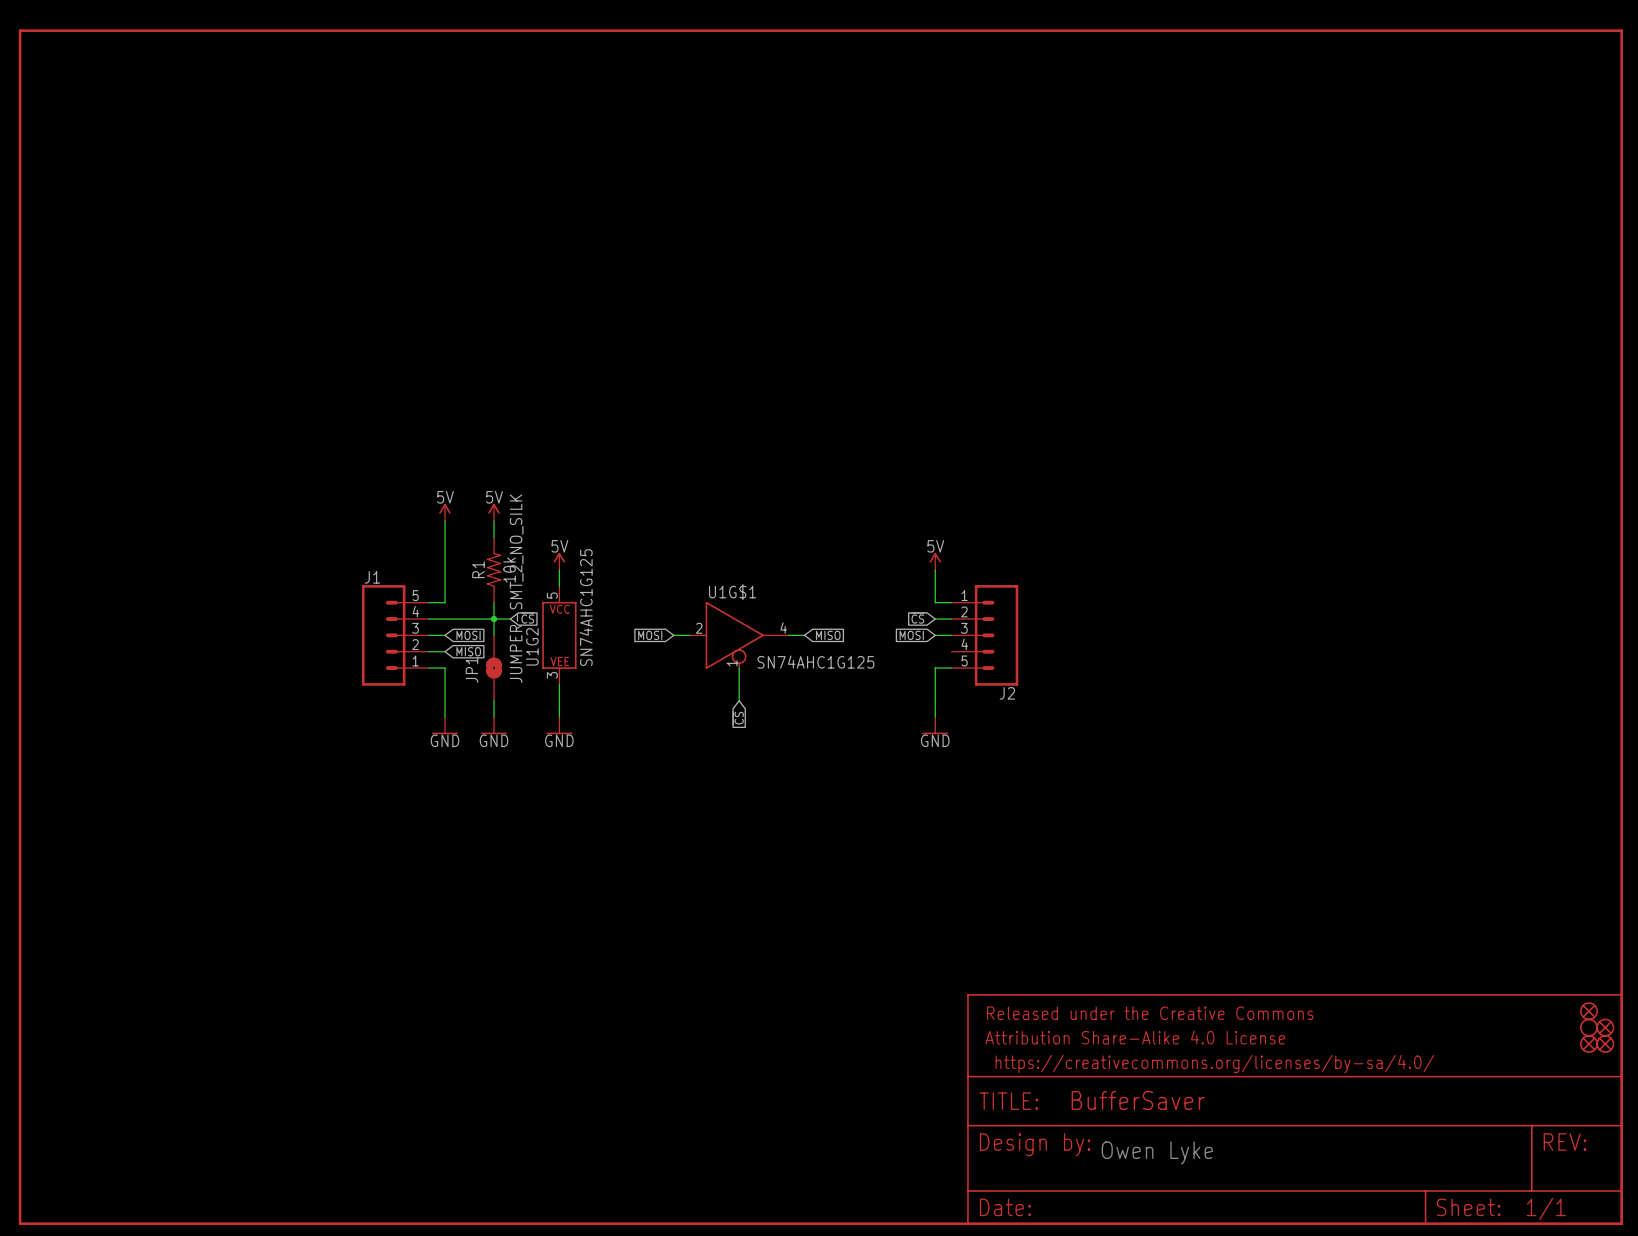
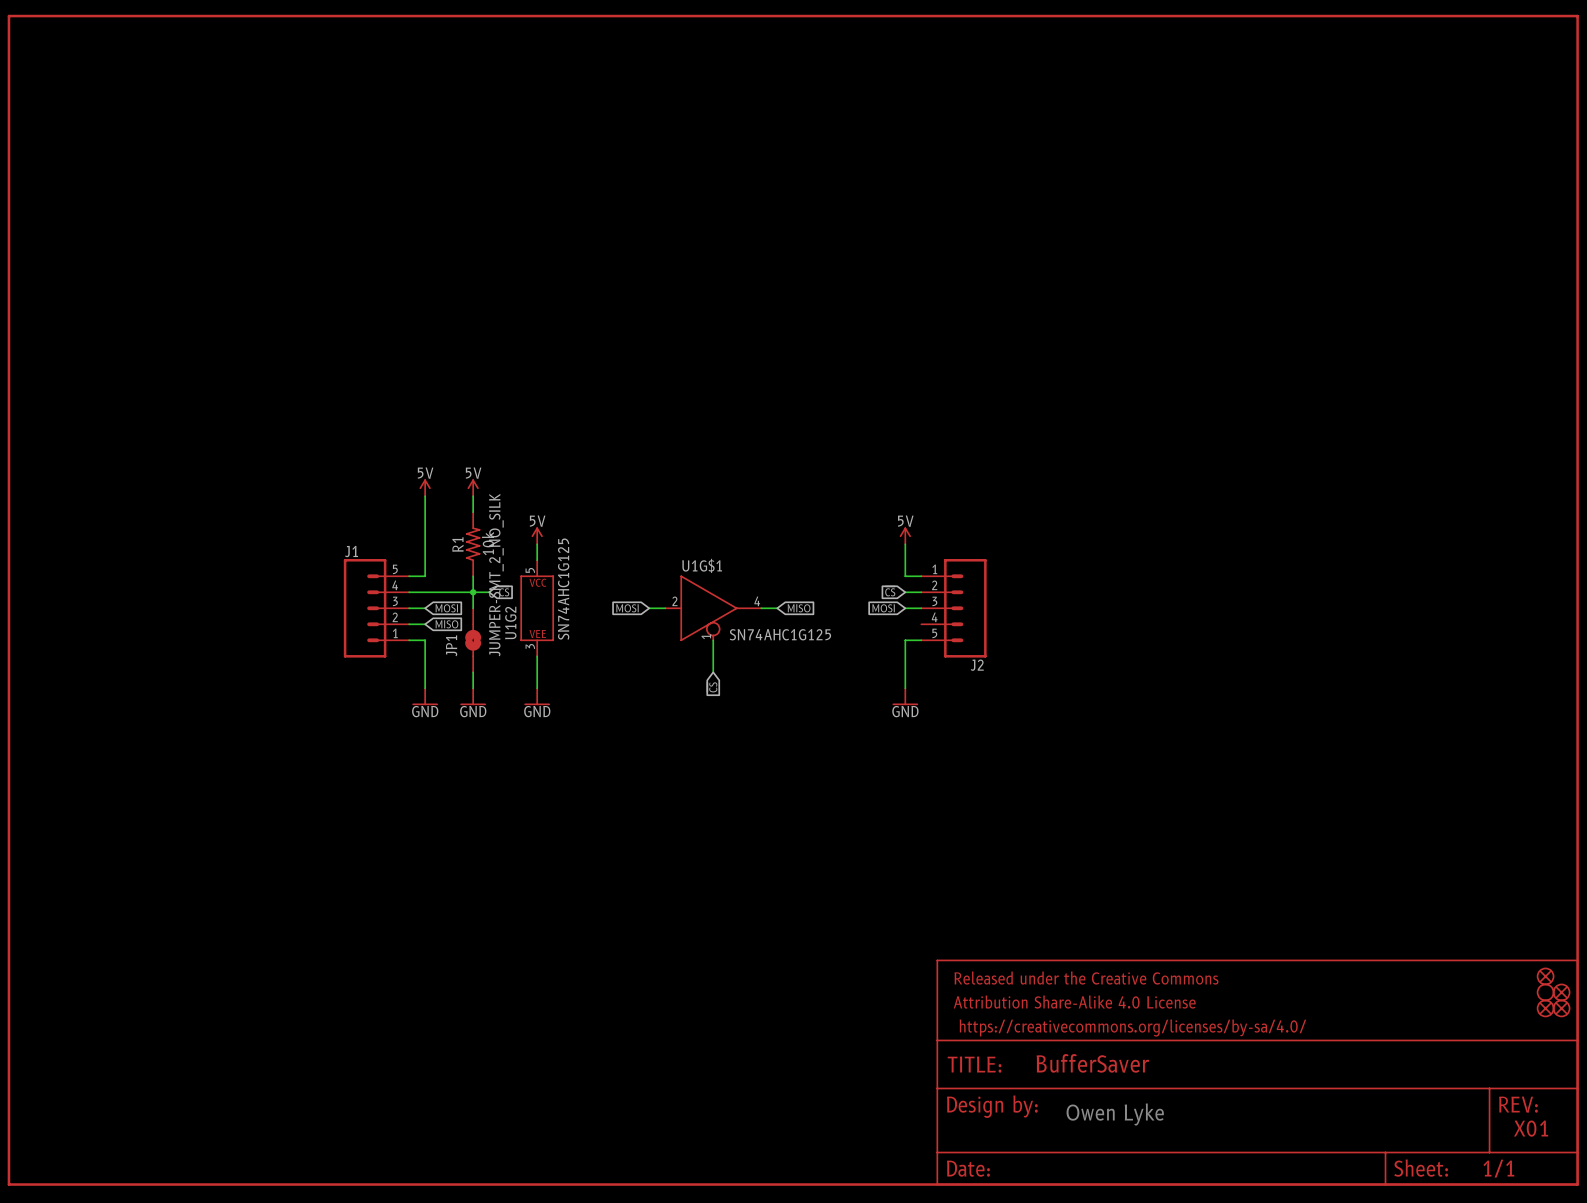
text: none -> X01 (1531, 1128)

